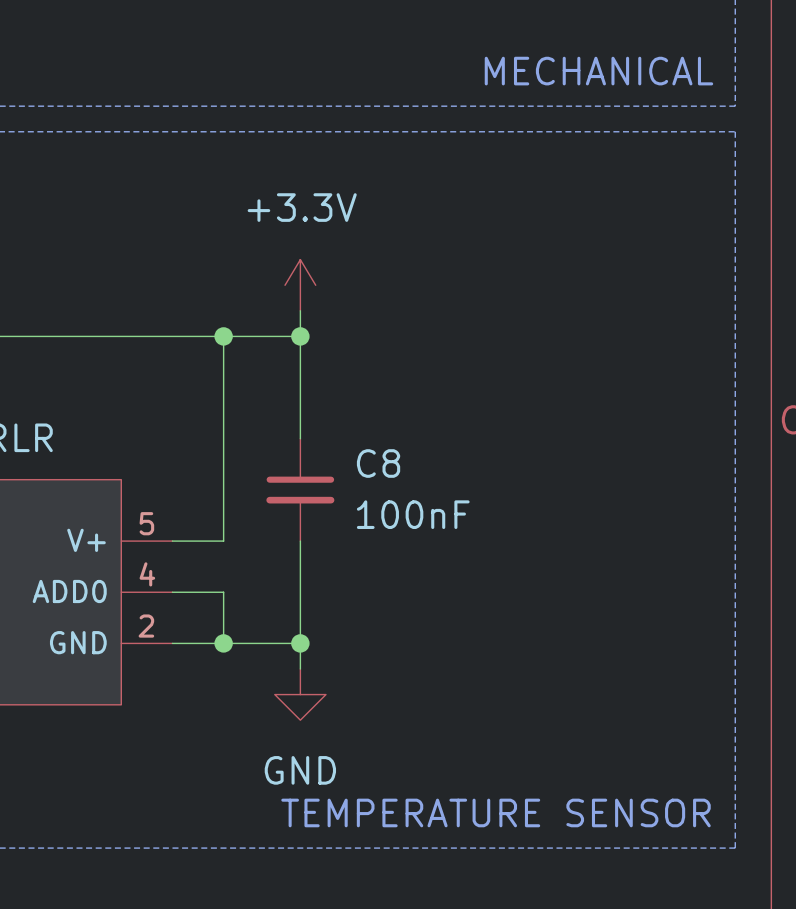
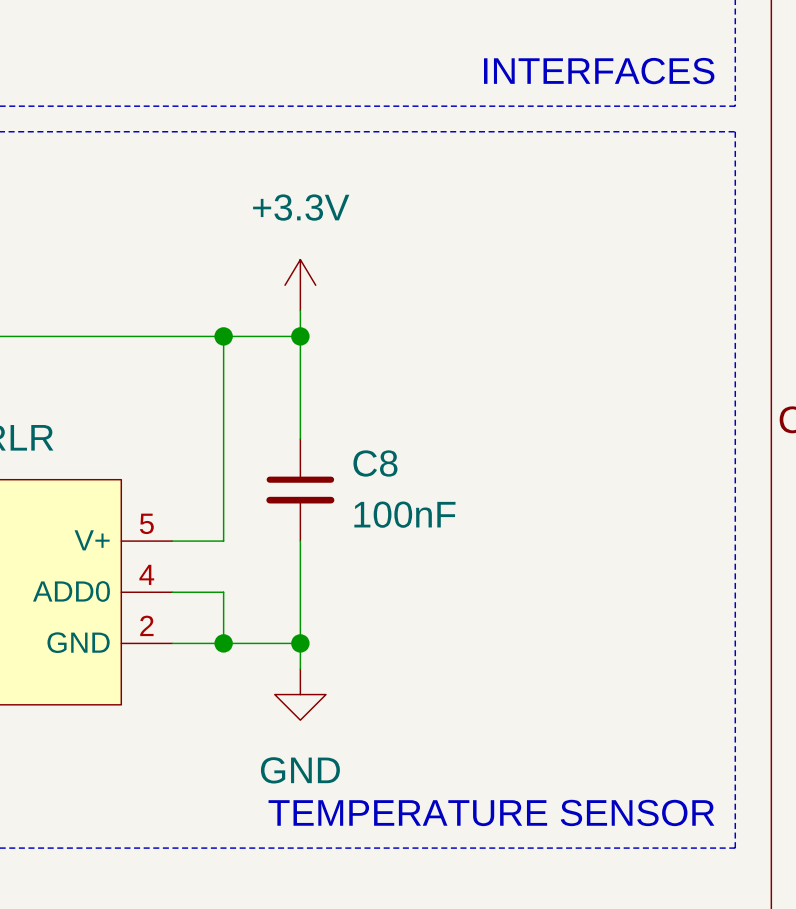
text: MECHANICAL (598, 71) -> INTERFACES (599, 71)

